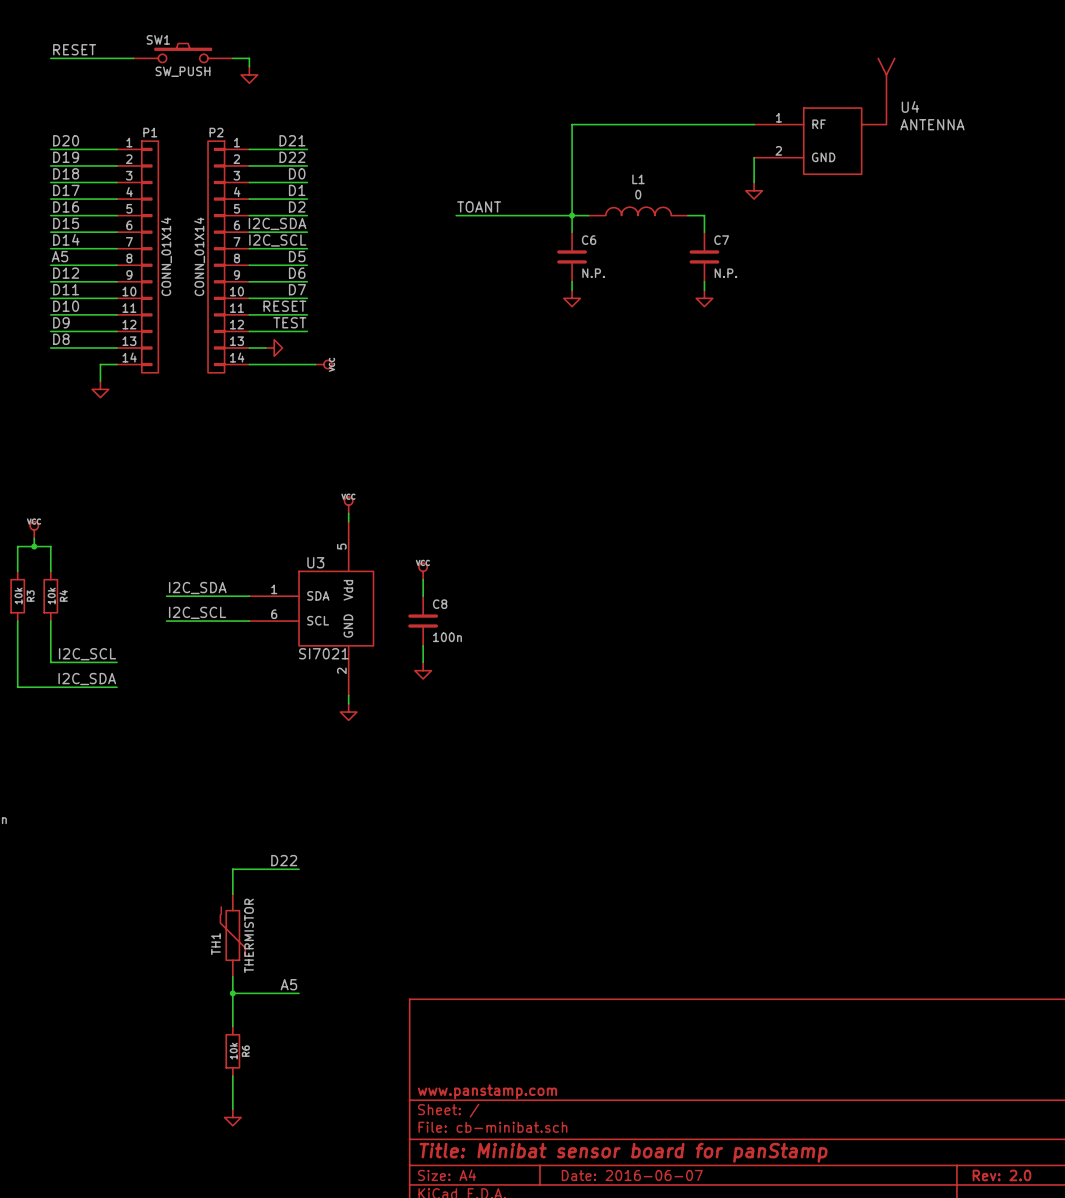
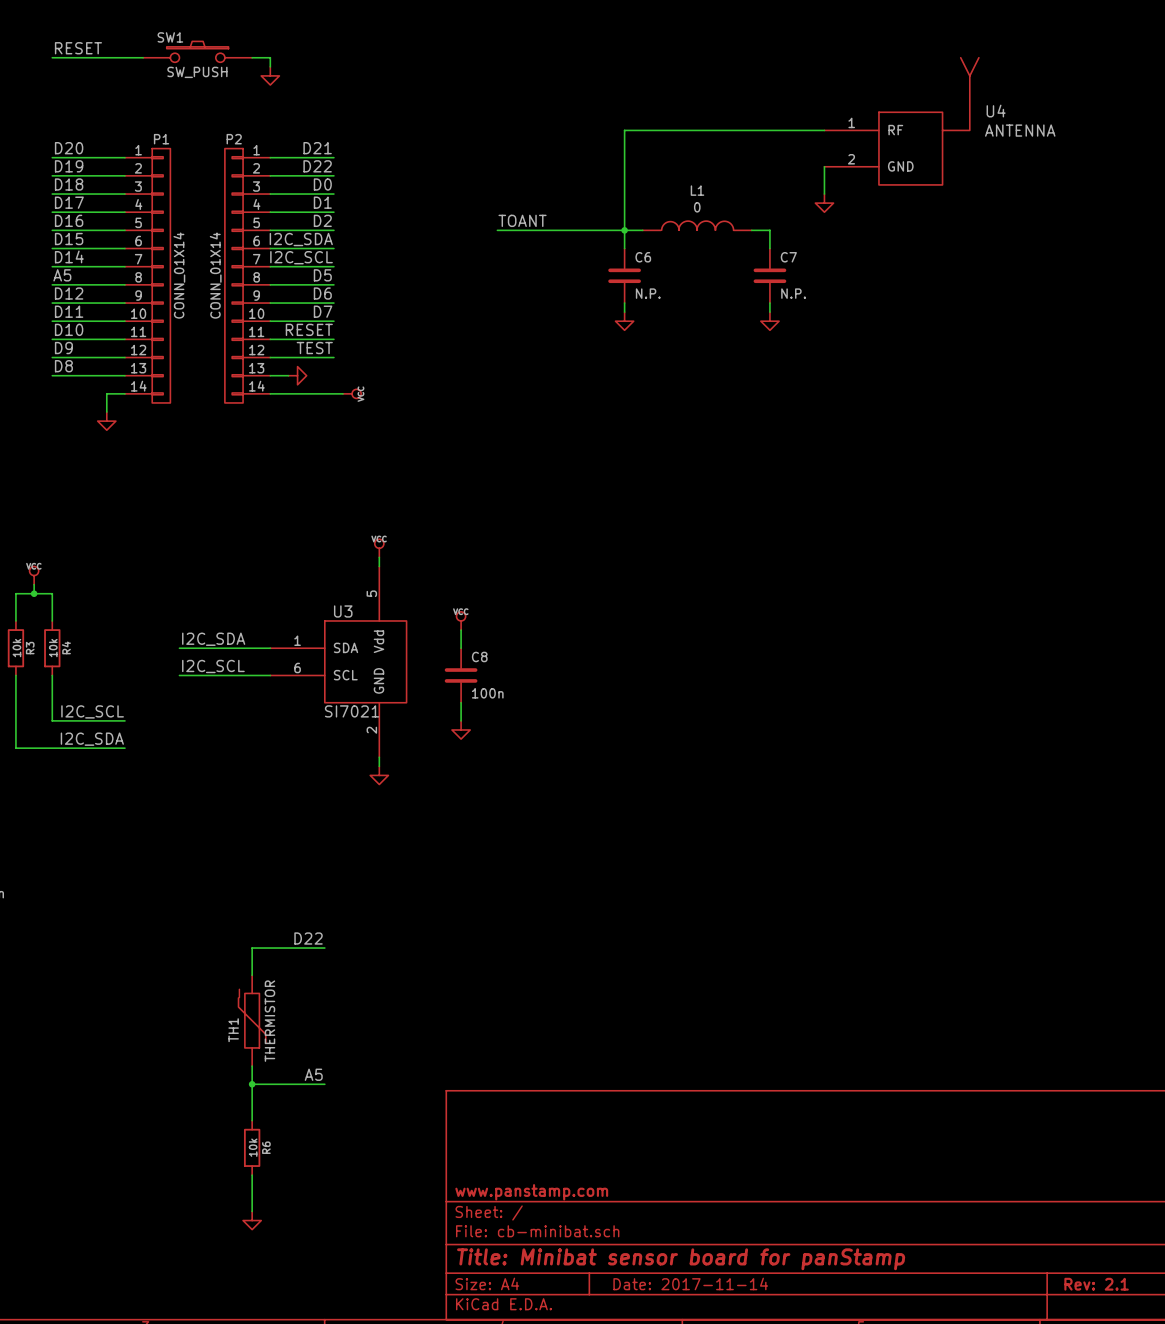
title block: Date: 2016-06-07 (632, 1175) -> Date: 2017-11-14 (690, 1283)
title block: Rev: 2.0 (1001, 1175) -> Rev: 2.1 (1096, 1284)

